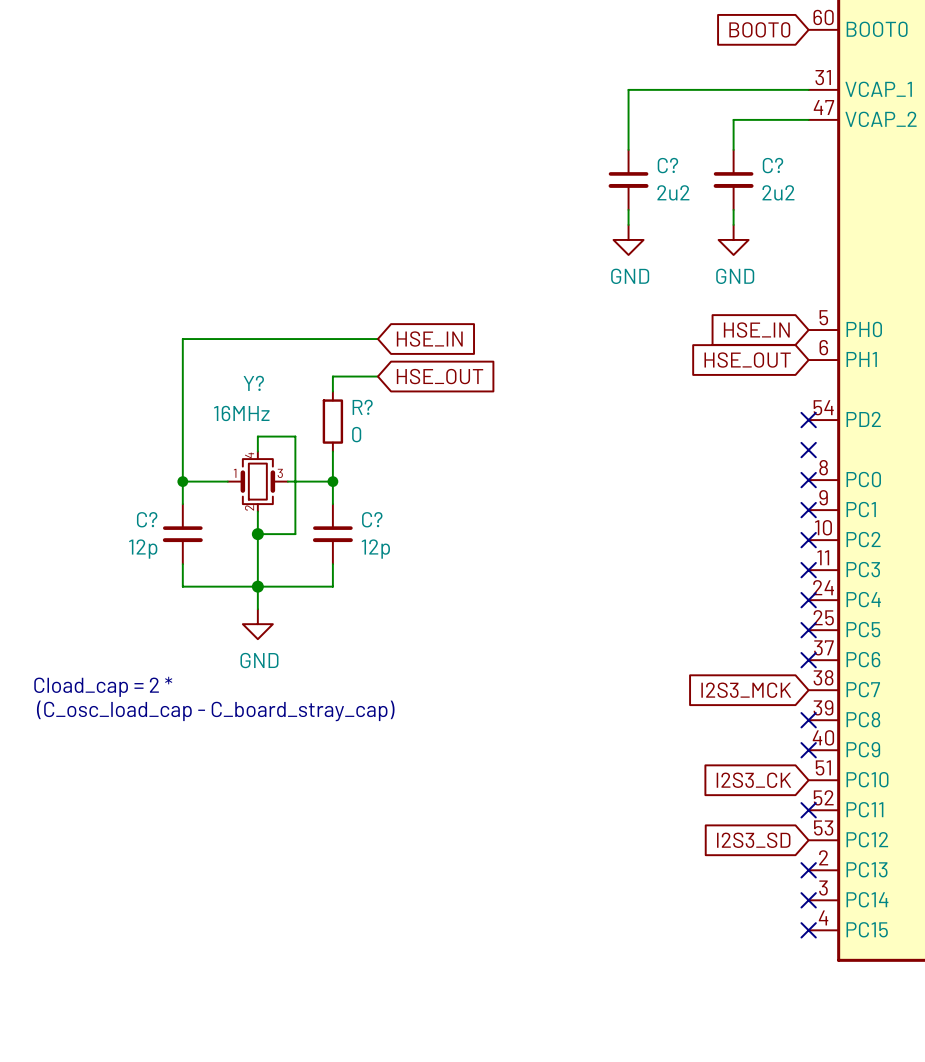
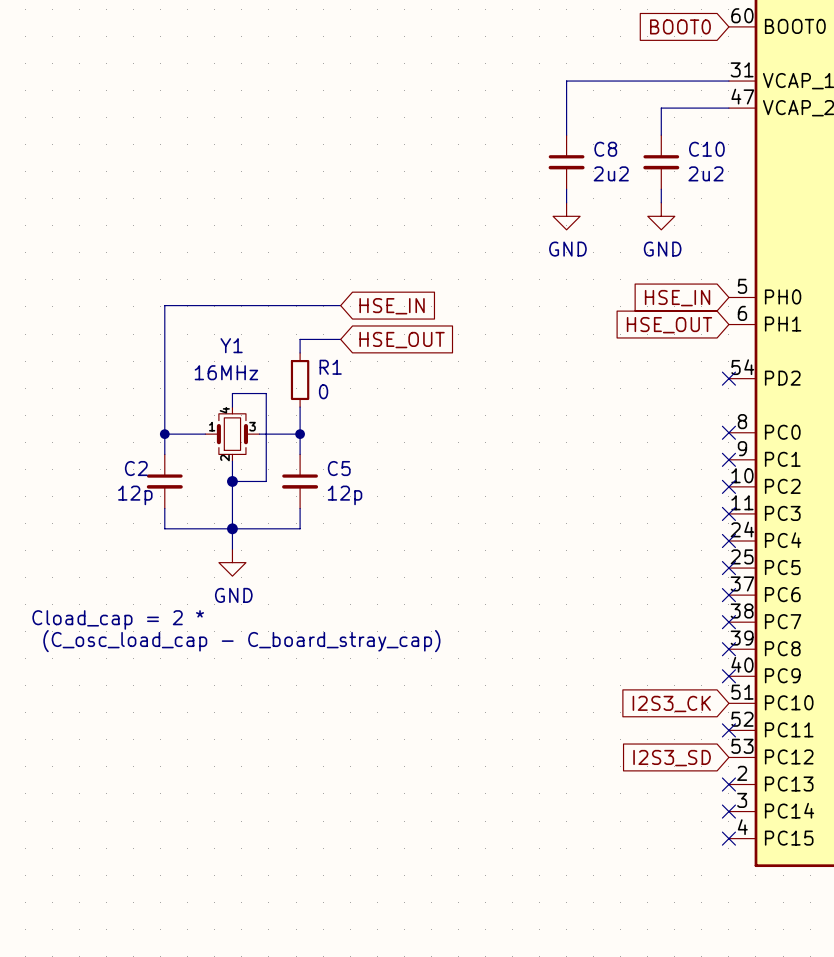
C? name: C? (667, 165) -> C8 (605, 149)
C? name: C? (772, 165) -> C10 (706, 149)
Y? name: Y? (253, 383) -> Y1 (231, 345)
R? name: R? (362, 407) -> R1 (330, 367)
no-connect mark: (808, 450) -> none
C? name: C? (147, 519) -> C2 (136, 468)
C? name: C? (372, 519) -> C5 (339, 468)
global label: I2S3_MCK (746, 690) -> none
no-connect mark: none -> (728, 622)

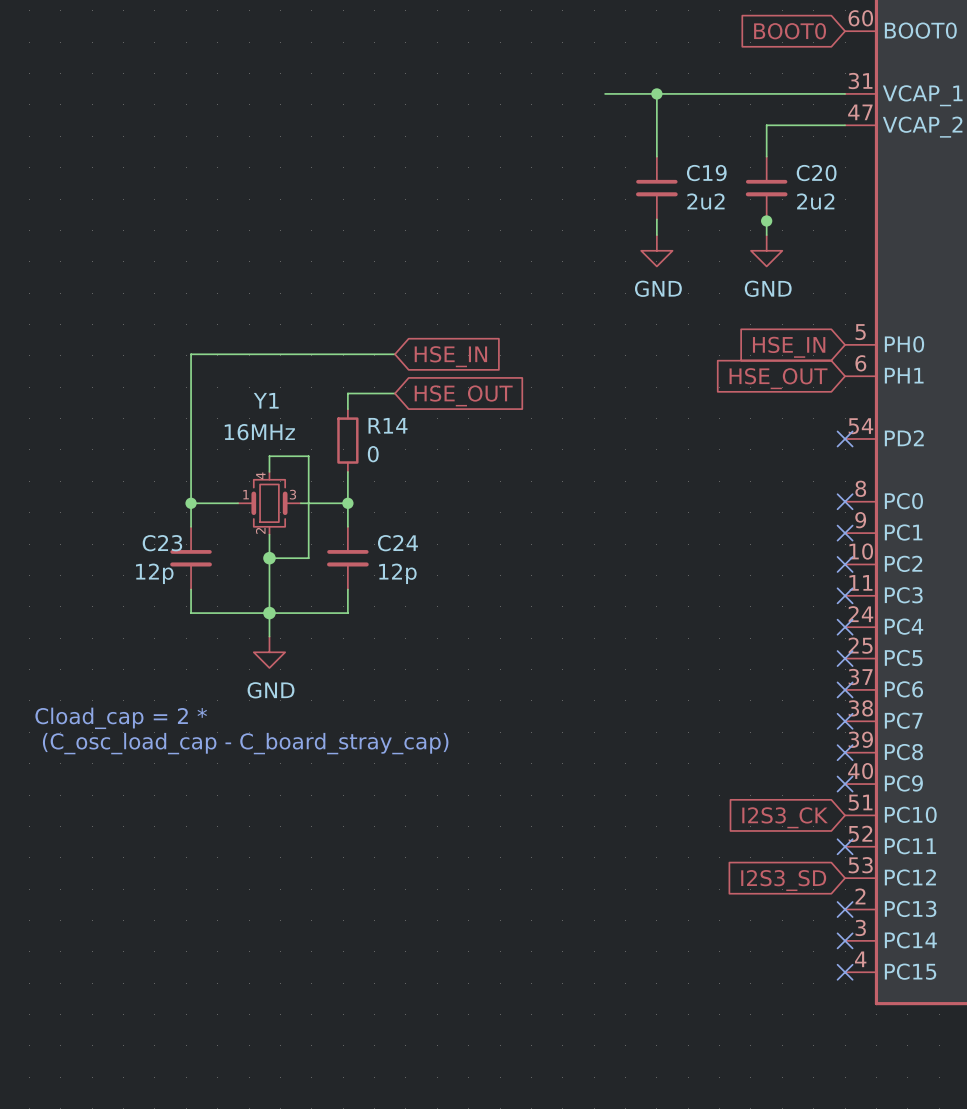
wire: none -> (605, 93) (656, 93)
junction: none -> (656, 93)
C8 name: C8 (605, 149) -> C19 (706, 173)
C10 name: C10 (706, 149) -> C20 (816, 173)
junction: none -> (766, 220)
R1 name: R1 (330, 367) -> R14 (388, 425)
C2 name: C2 (136, 468) -> C23 (162, 543)
C5 name: C5 (339, 468) -> C24 (397, 543)

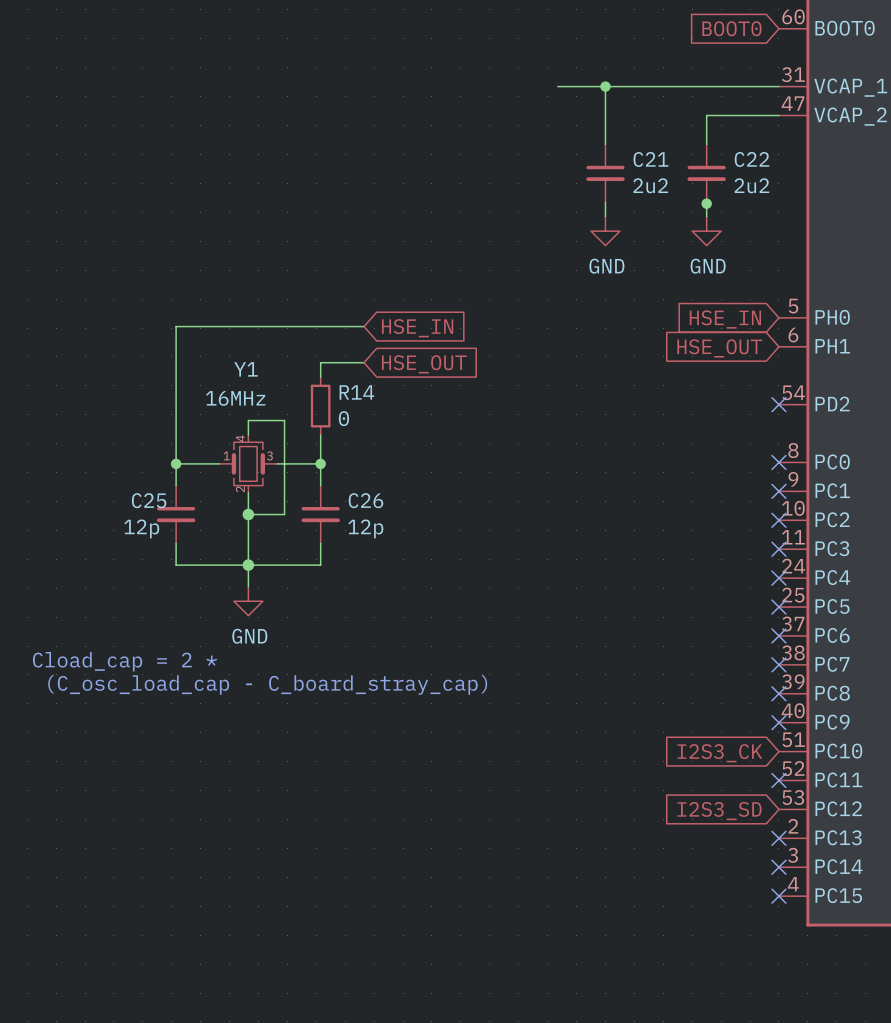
C19 name: C19 (706, 173) -> C21 (650, 159)
C20 name: C20 (816, 173) -> C22 (751, 159)
C23 name: C23 (162, 543) -> C25 (149, 500)
C24 name: C24 (397, 543) -> C26 (365, 500)

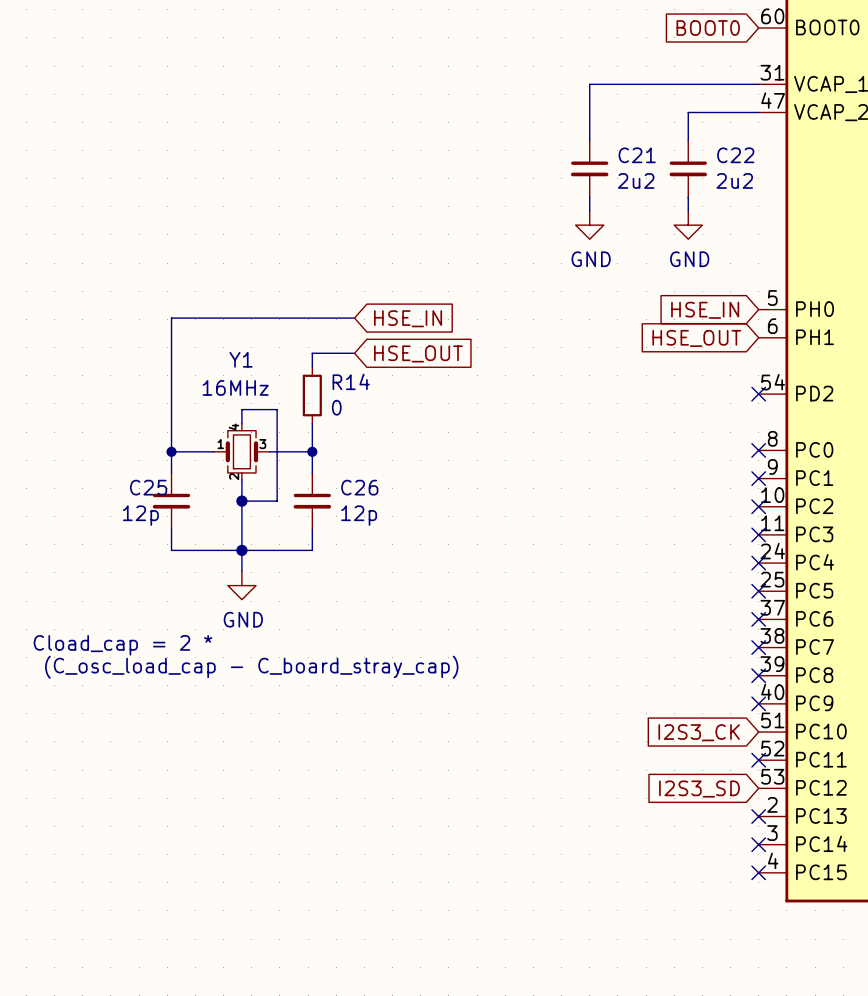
wire: (557, 86) (605, 86) -> none
junction: (605, 86) -> none
junction: (706, 203) -> none

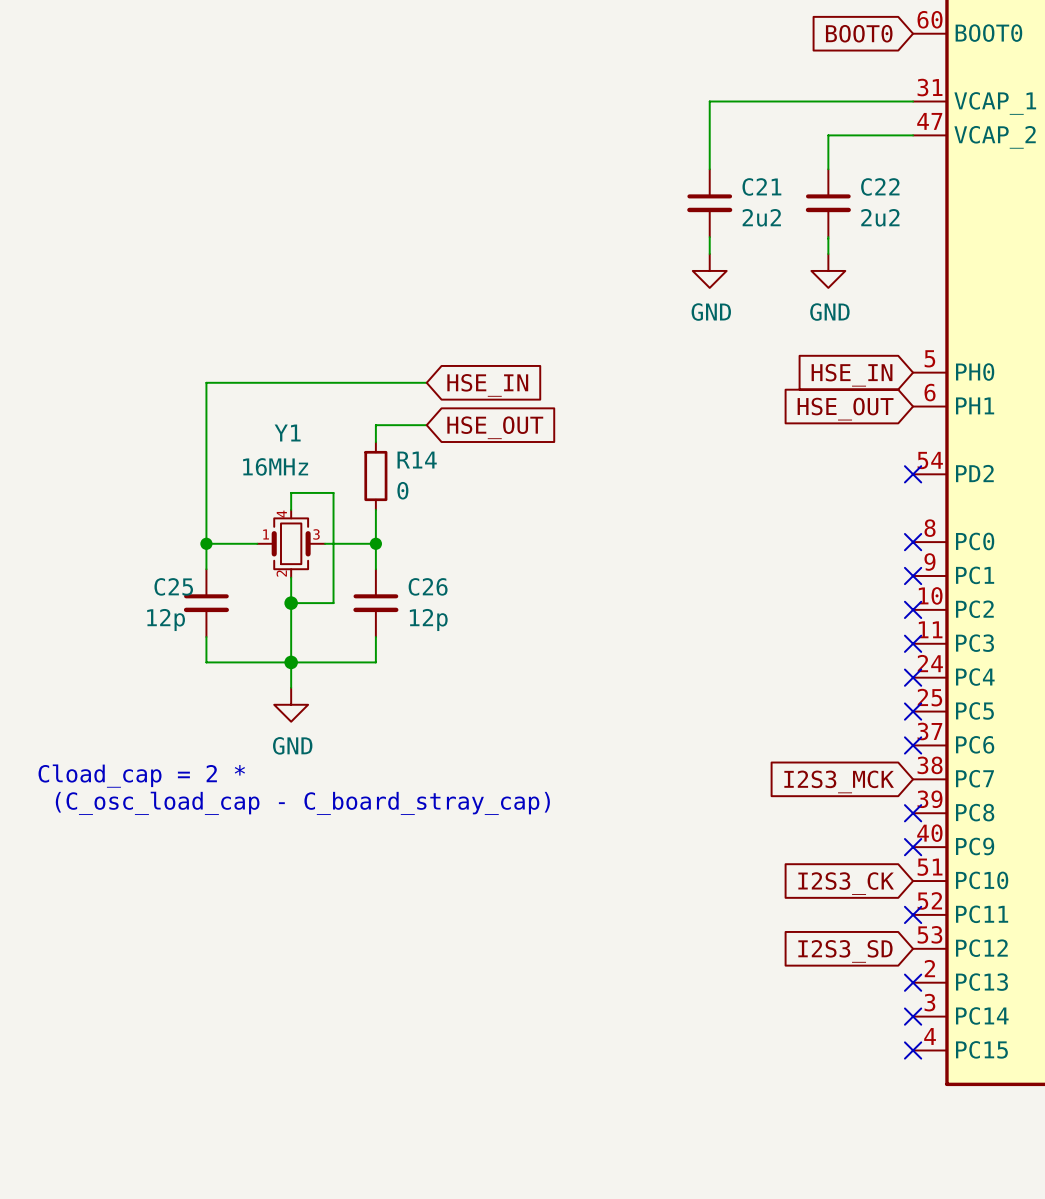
no-connect mark: (758, 647) -> none
global label: none -> I2S3_MCK (839, 781)

